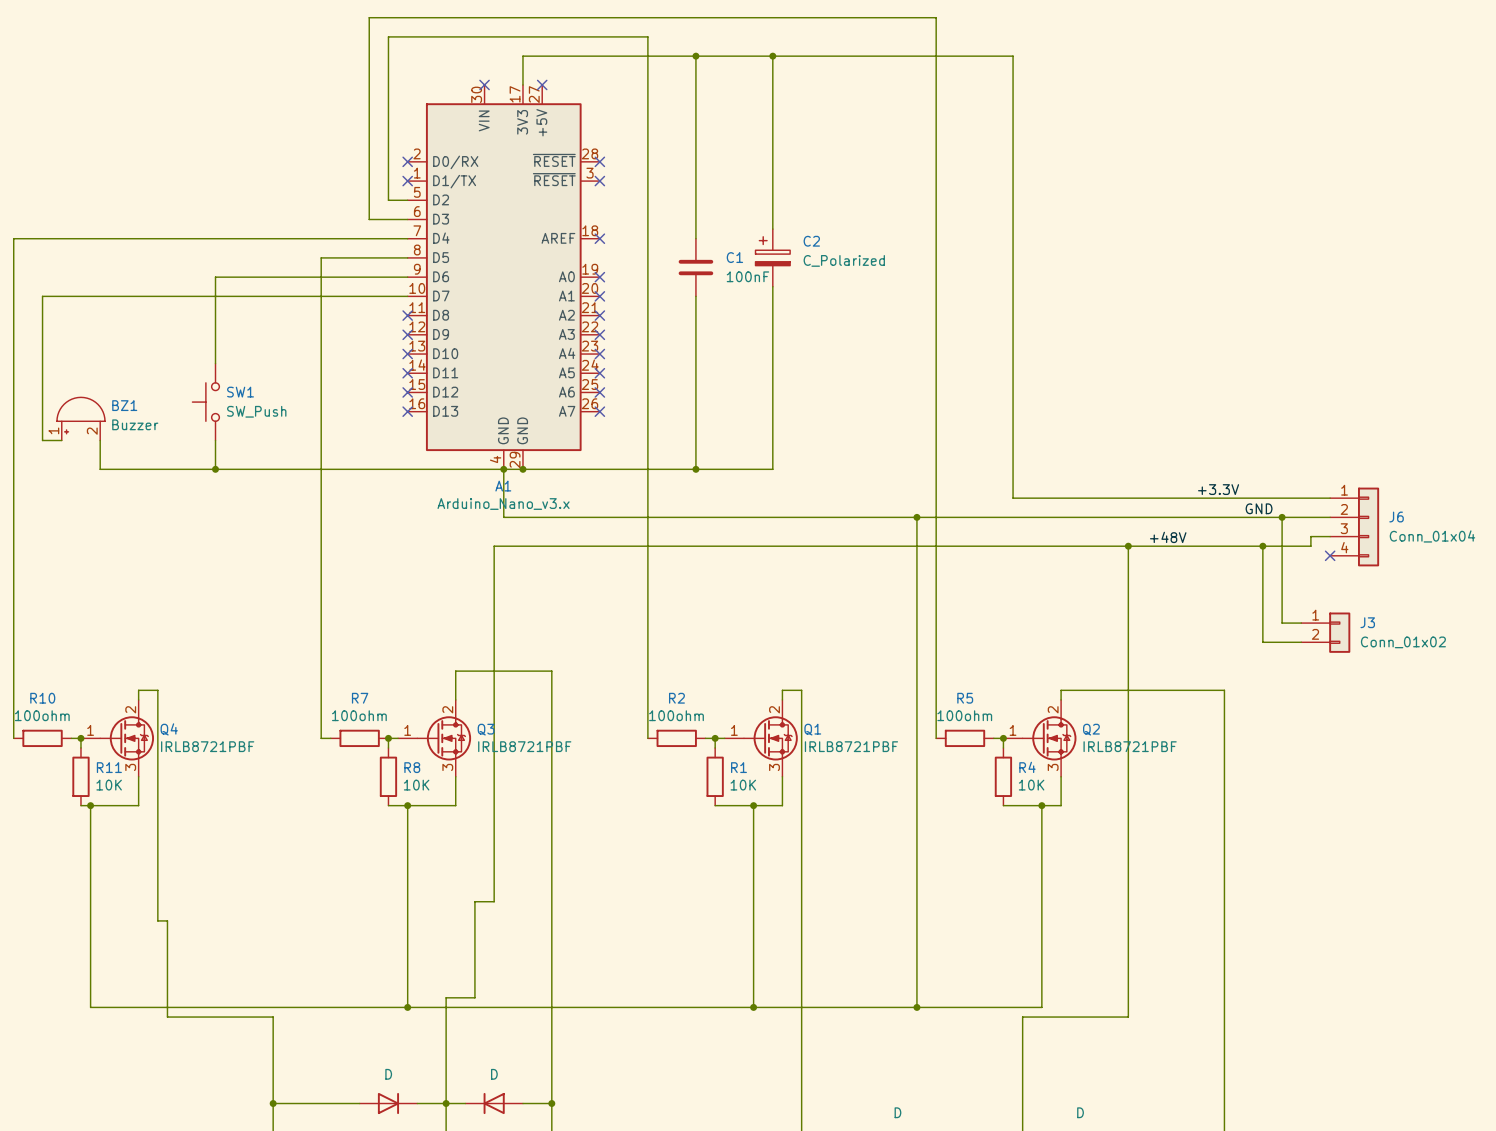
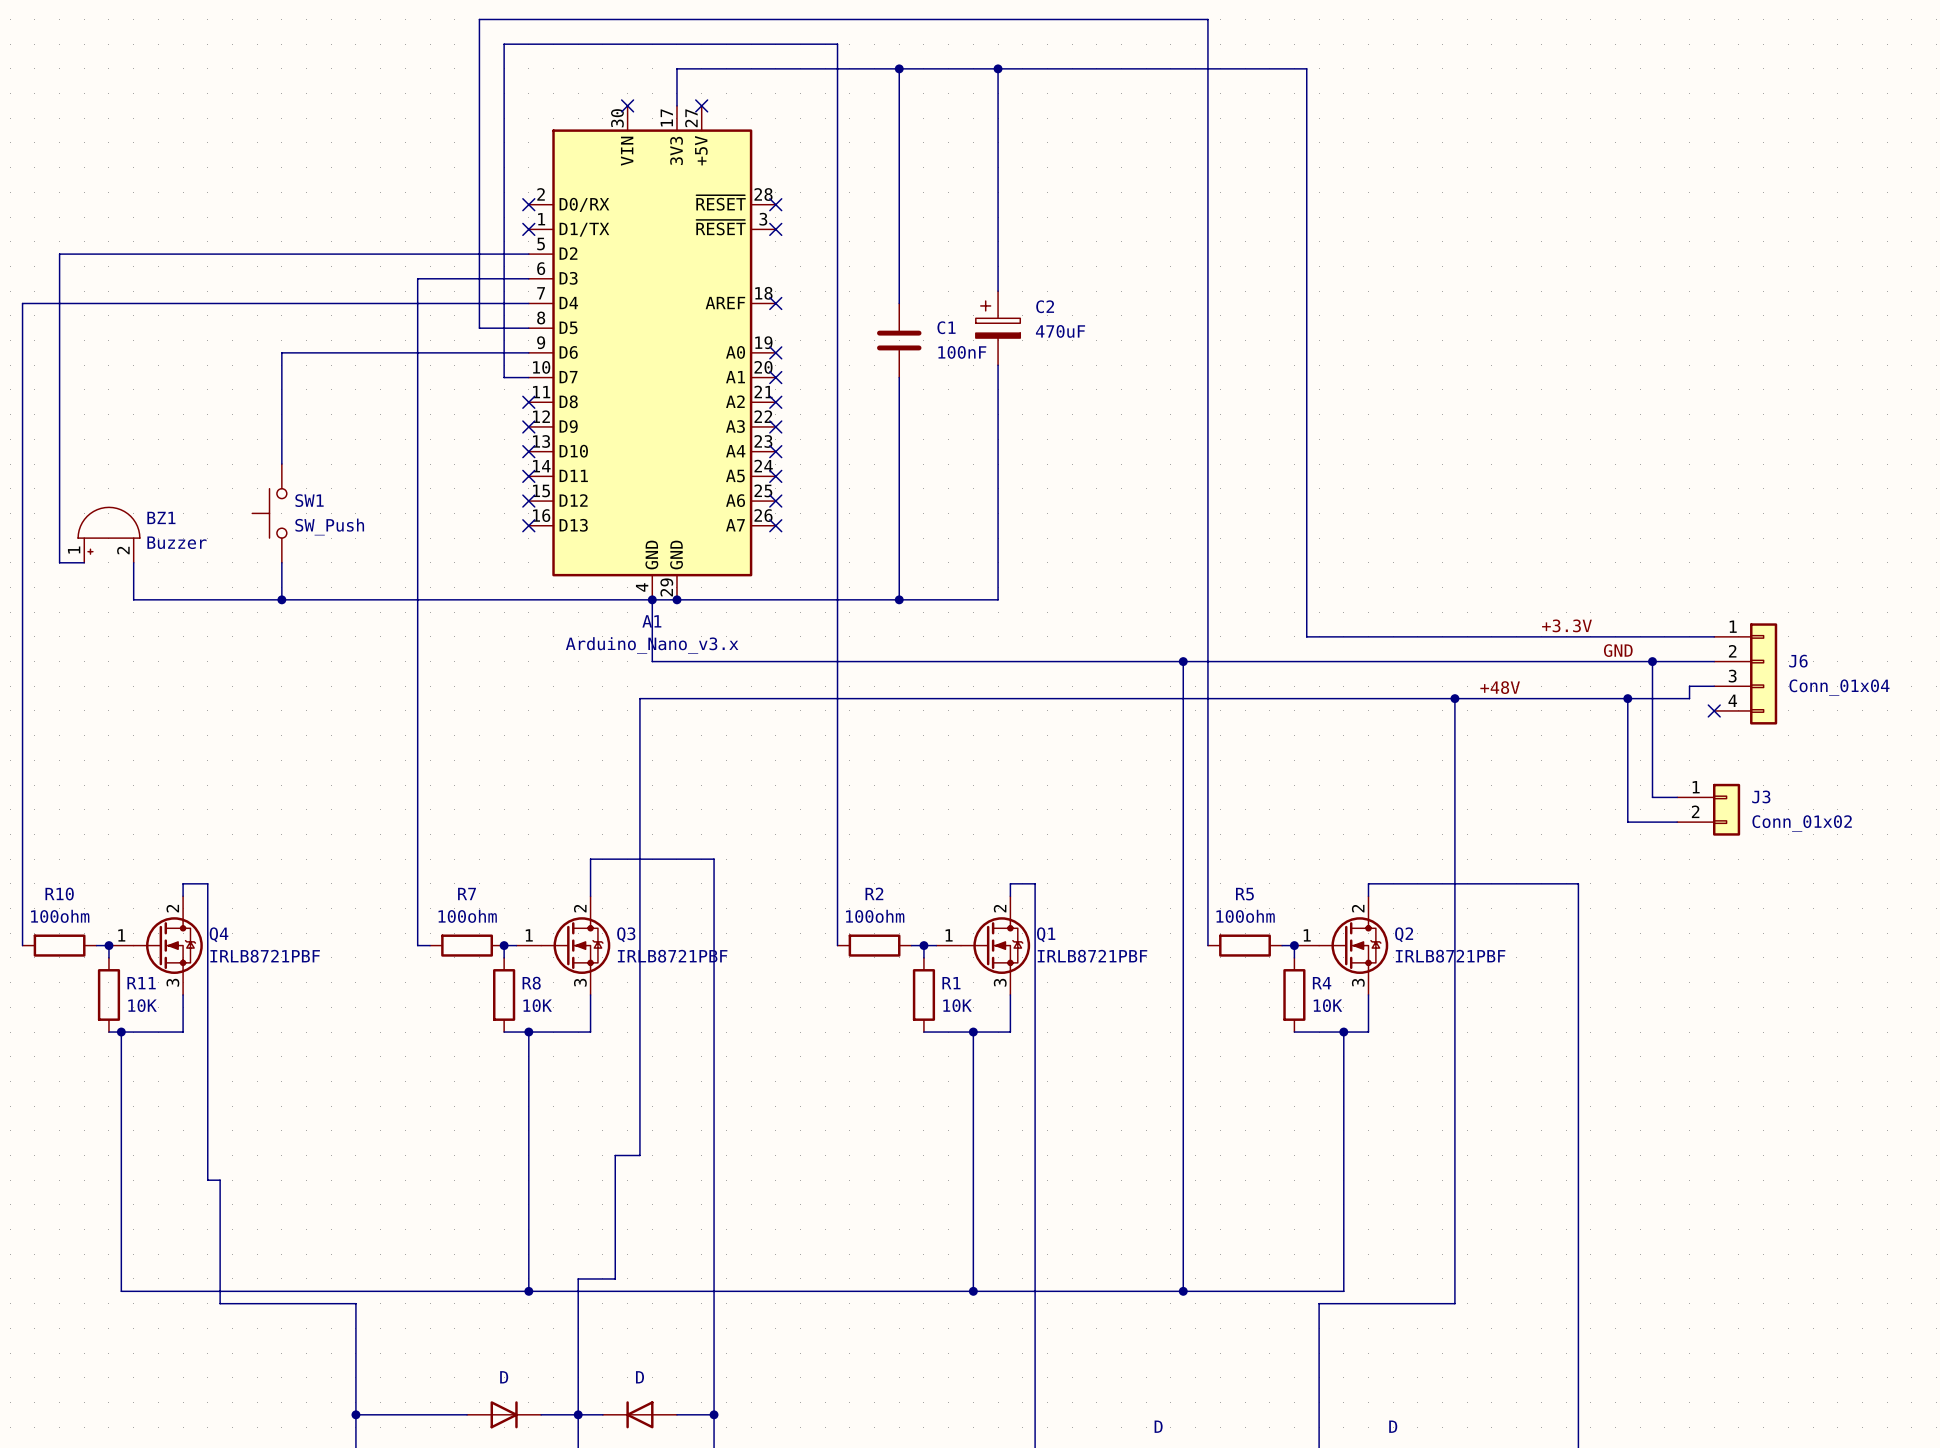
wire: (321, 257) (369, 257) -> (417, 328) (417, 278) (479, 278) (479, 328)
C2 value: C_Polarized (844, 260) -> 470uF (1060, 331)
wire: (42, 296) (388, 296) -> (59, 377) (59, 254) (504, 254) (504, 377)

